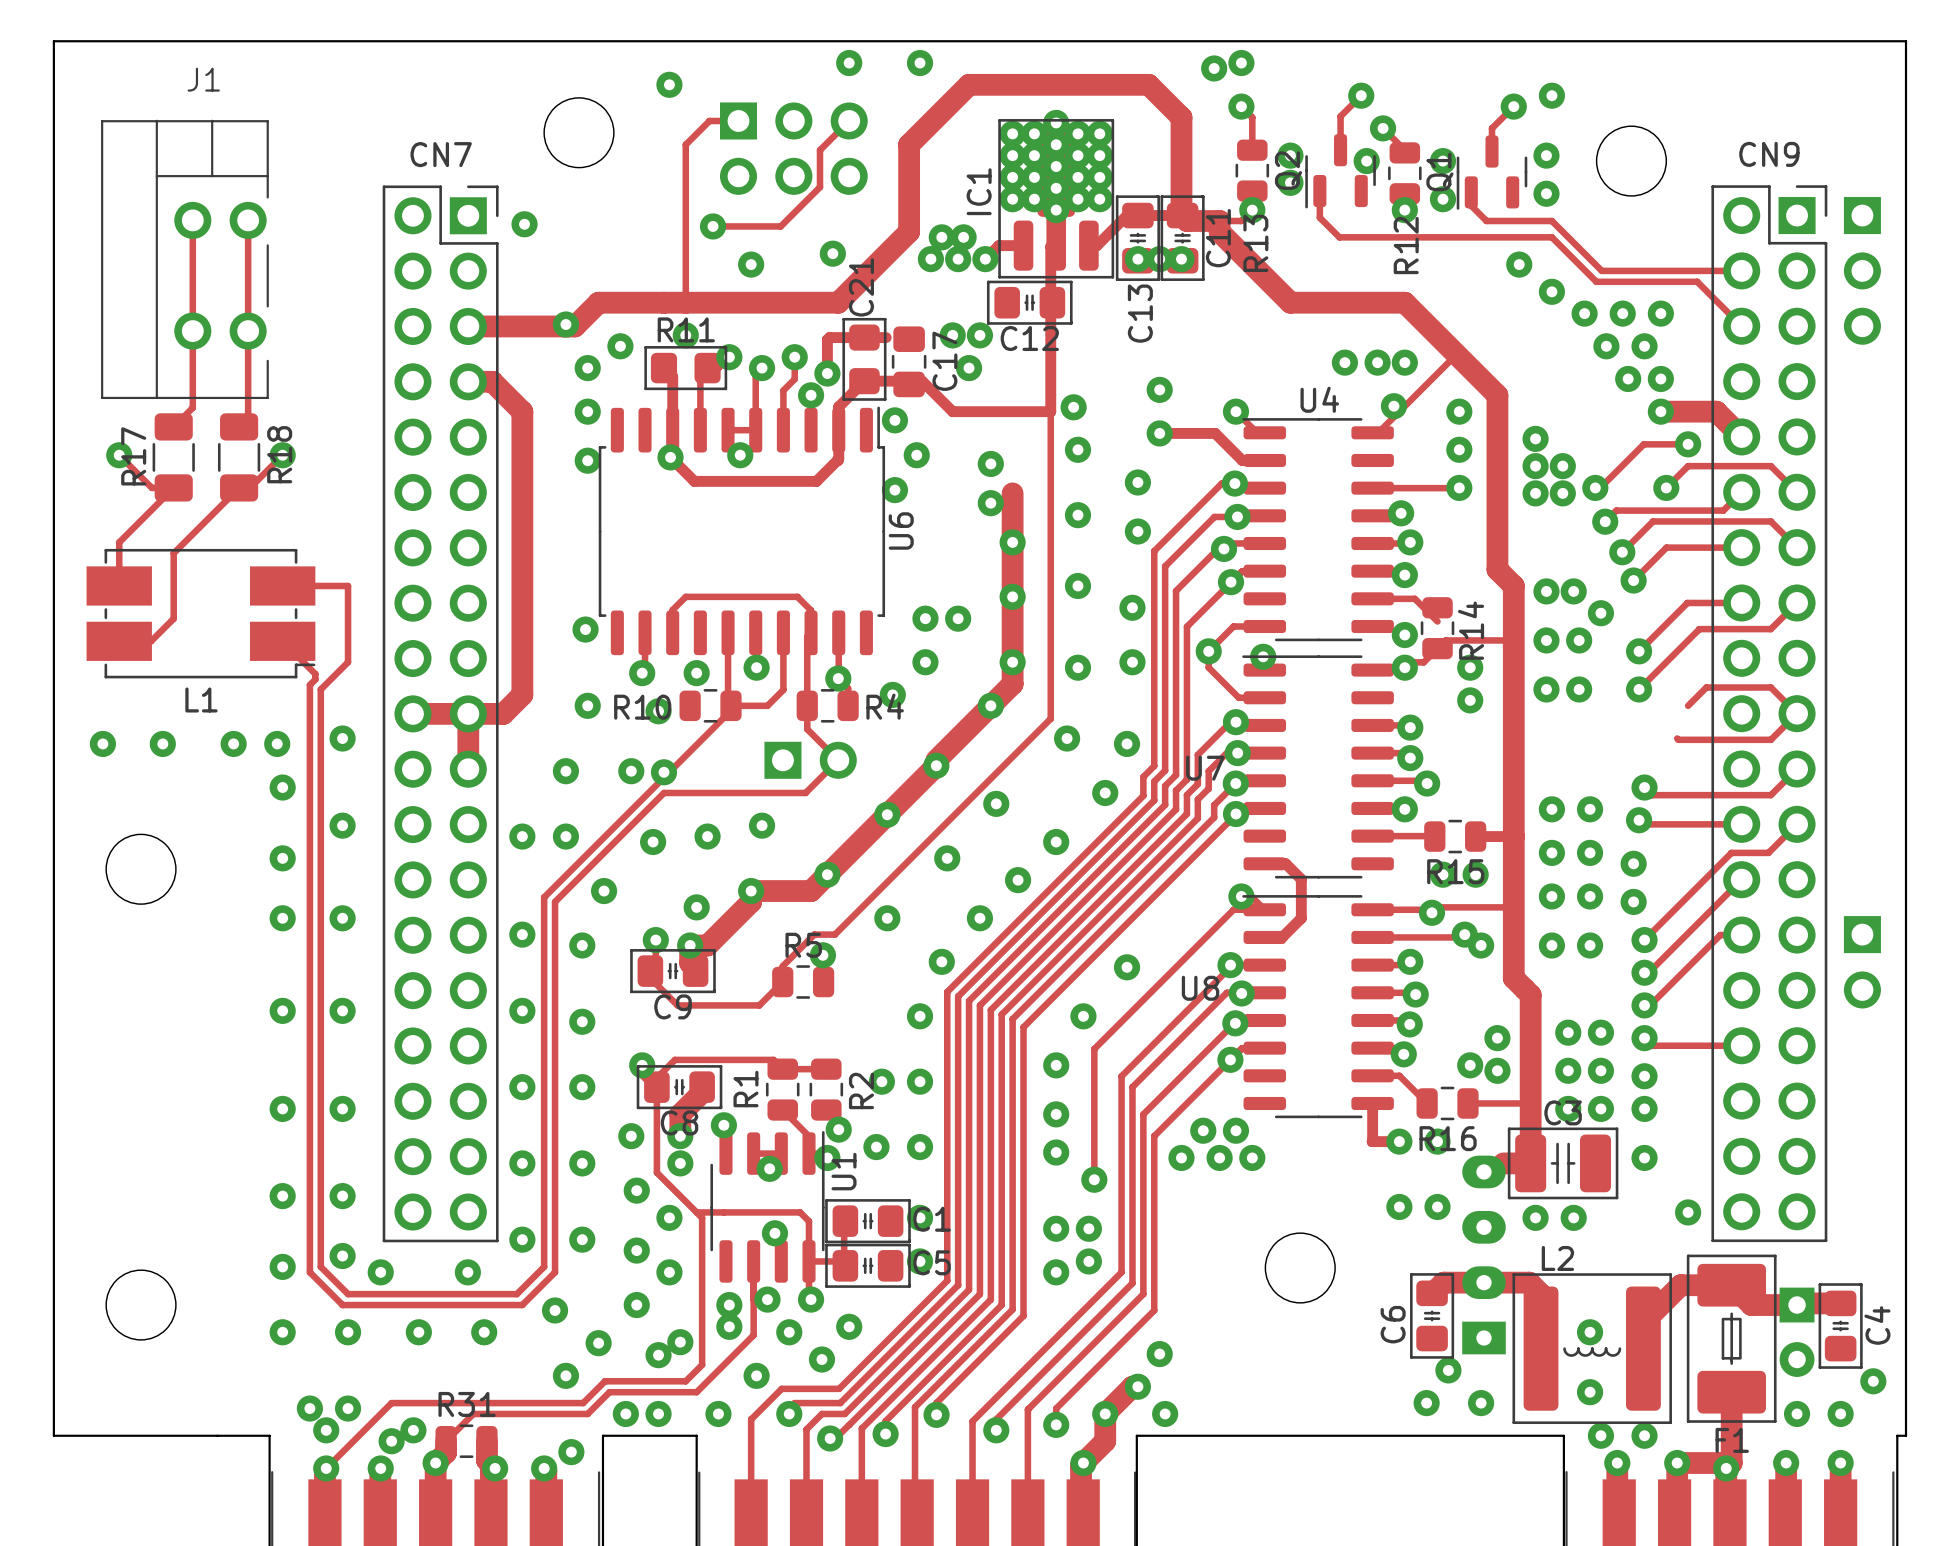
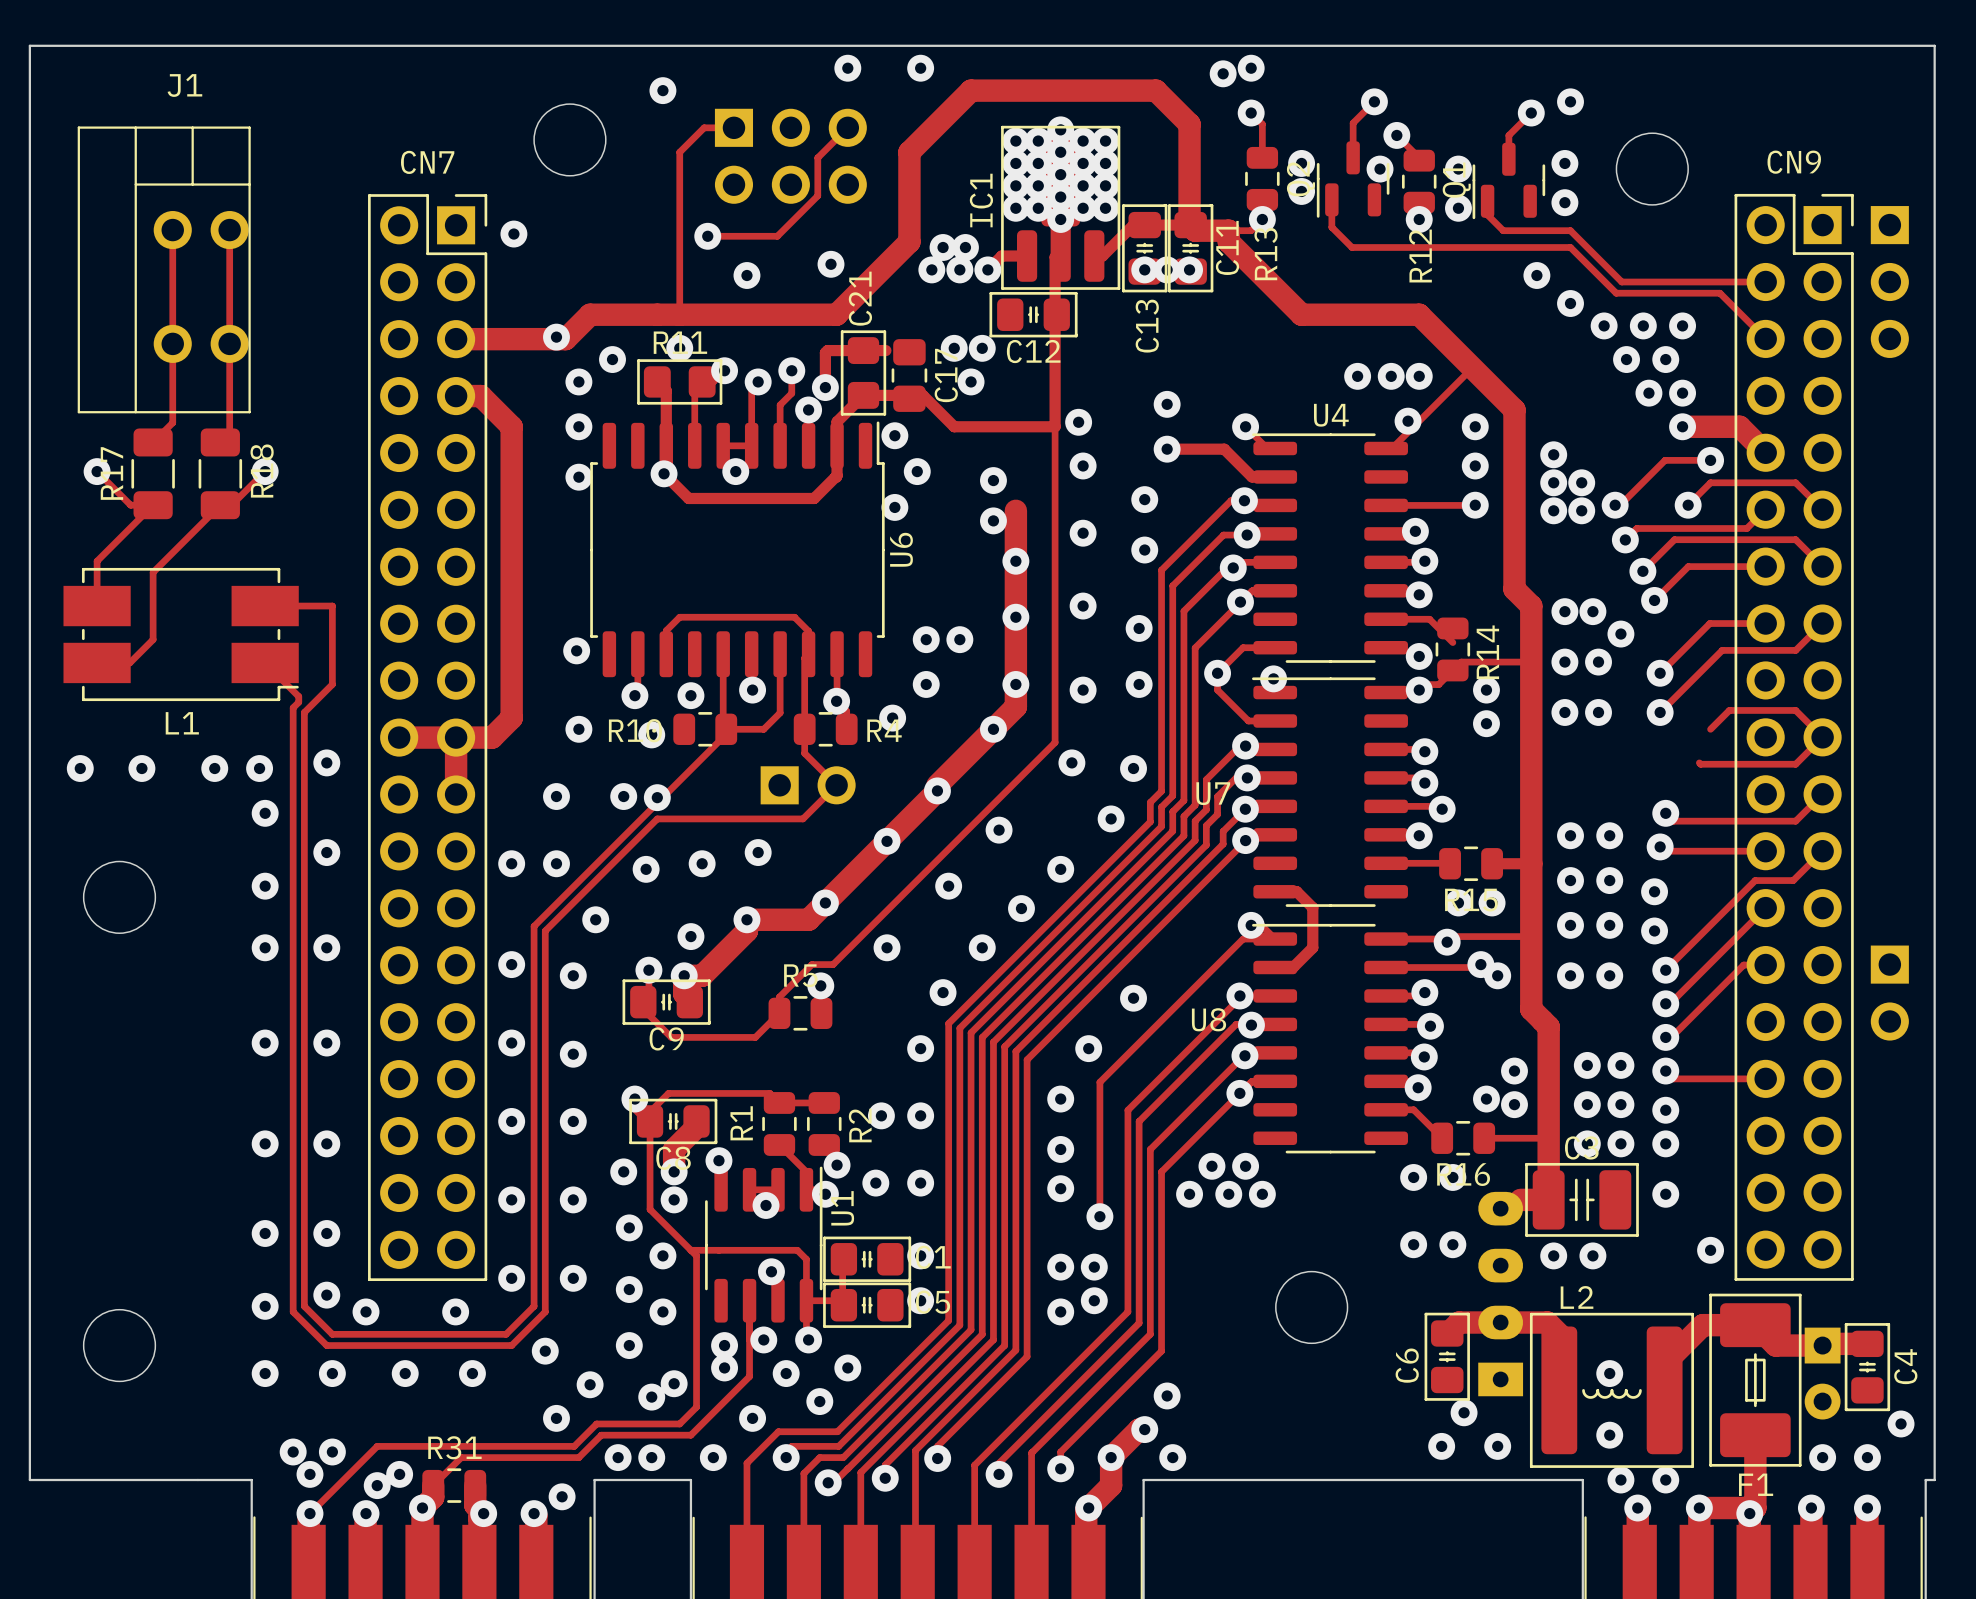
J1 footprint: [101, 119, 269, 400] -> [77, 126, 251, 414]
track: (1372, 1103) (1372, 1141) (1399, 1141) -> none

